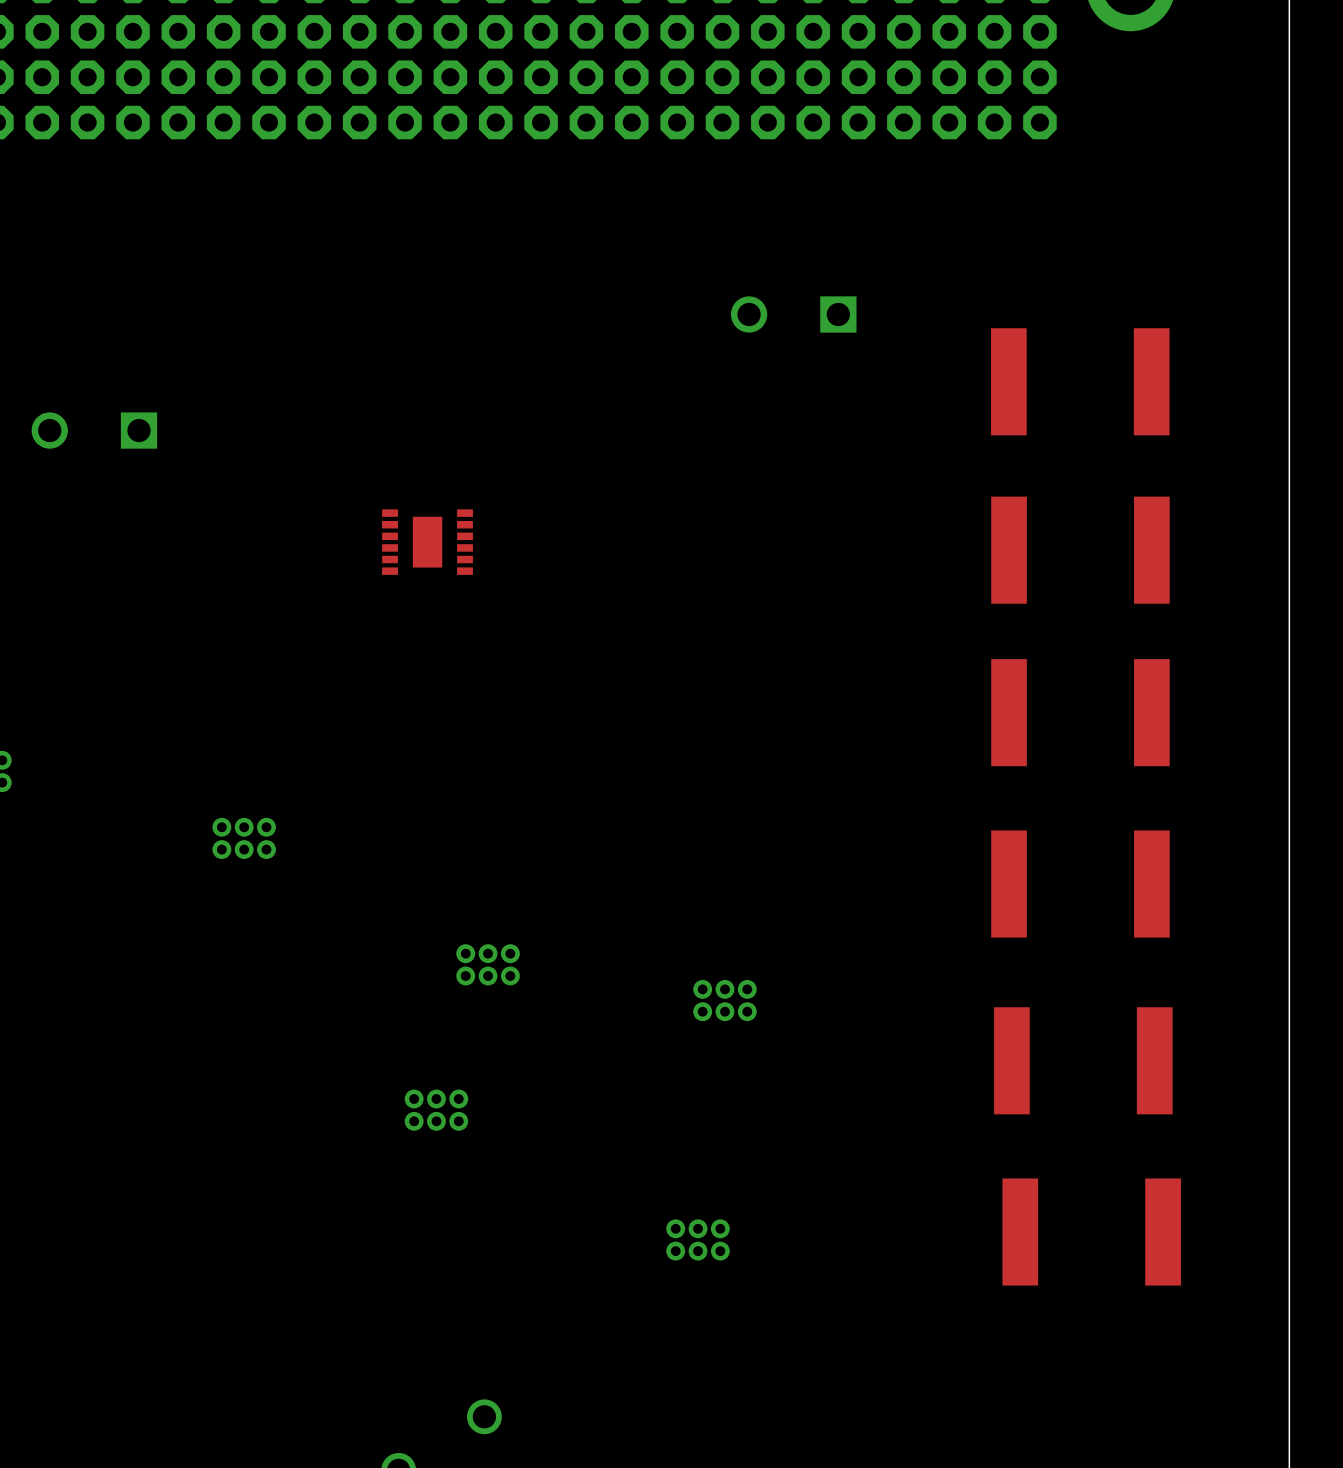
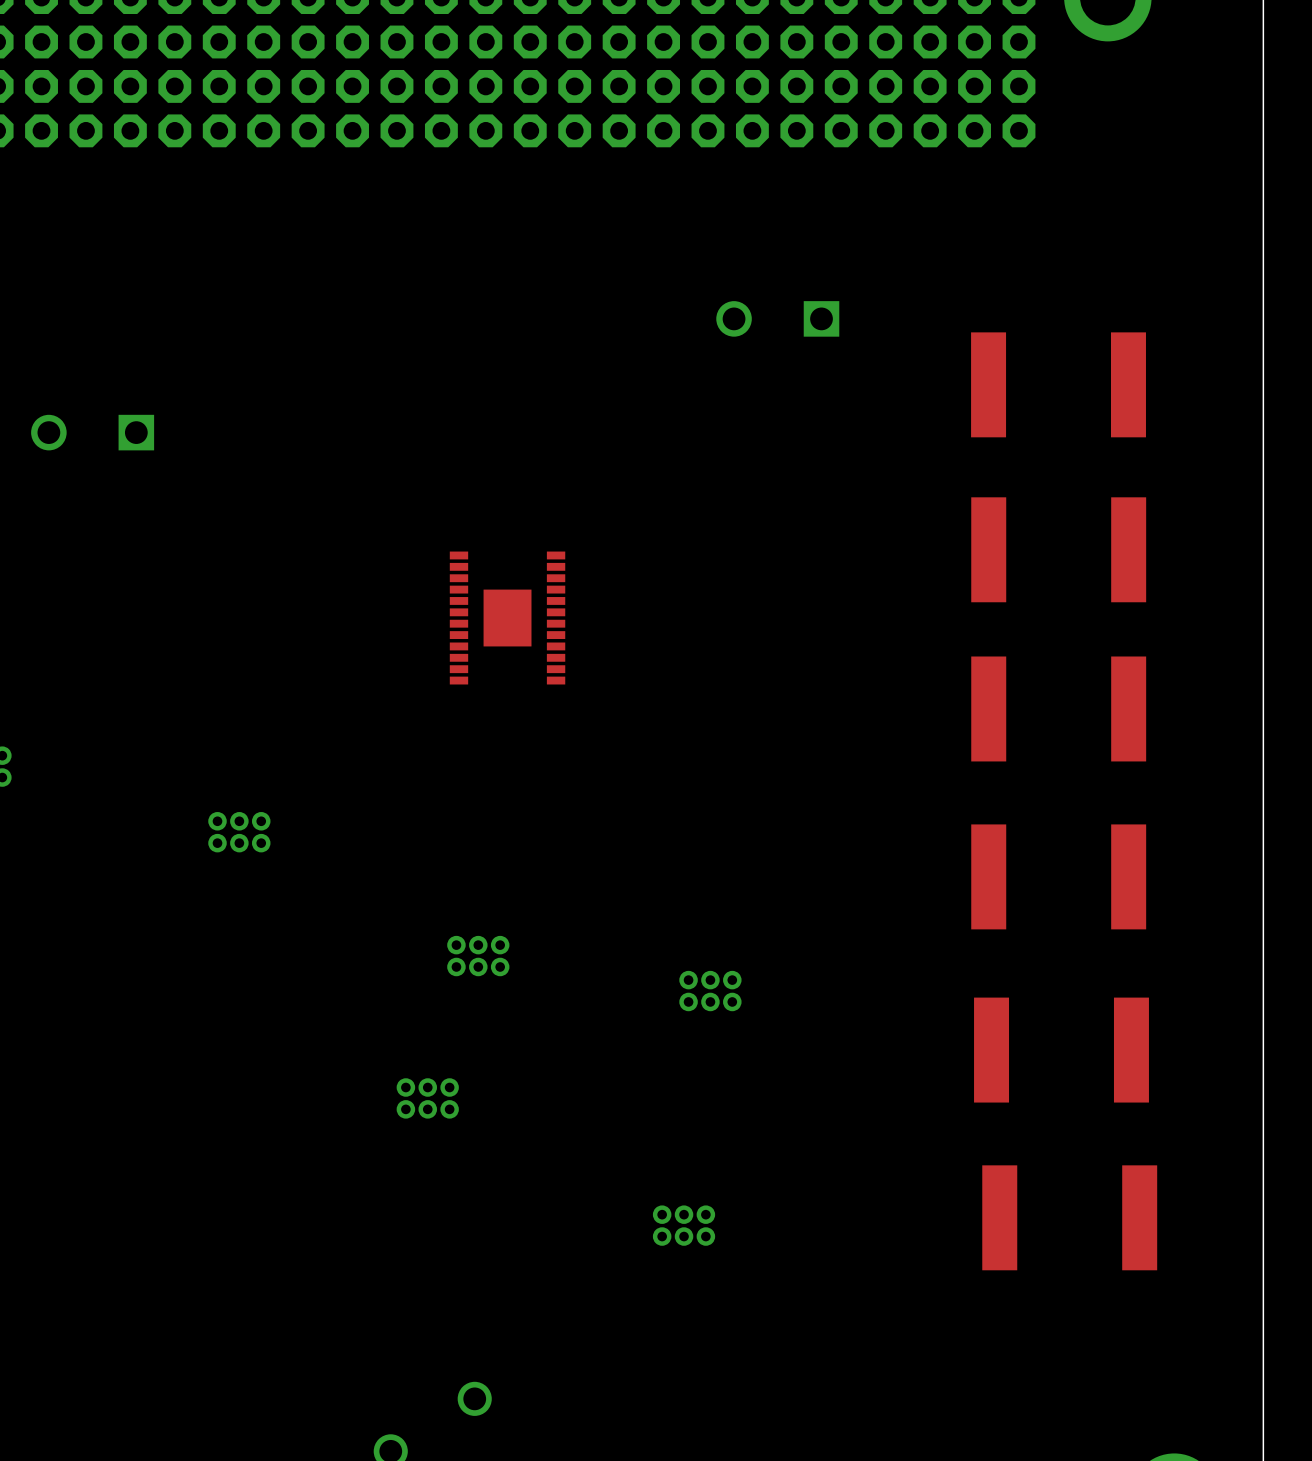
part: (427, 542) -> none
part: none -> (507, 618)

